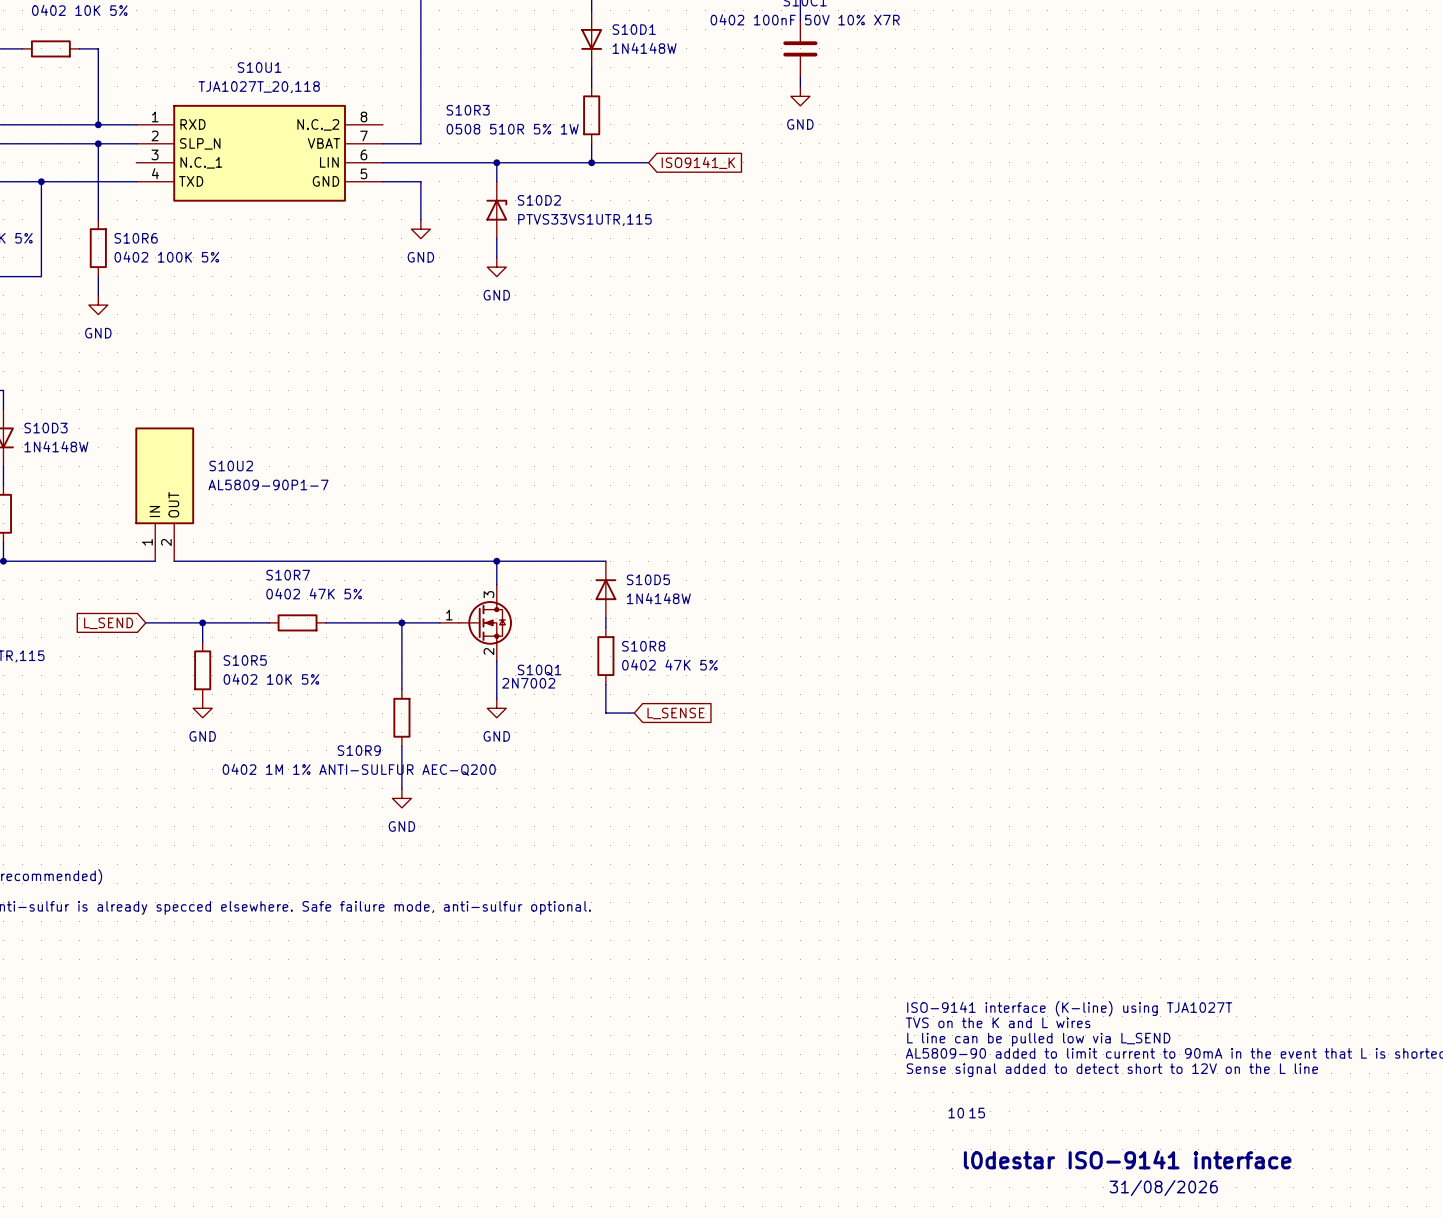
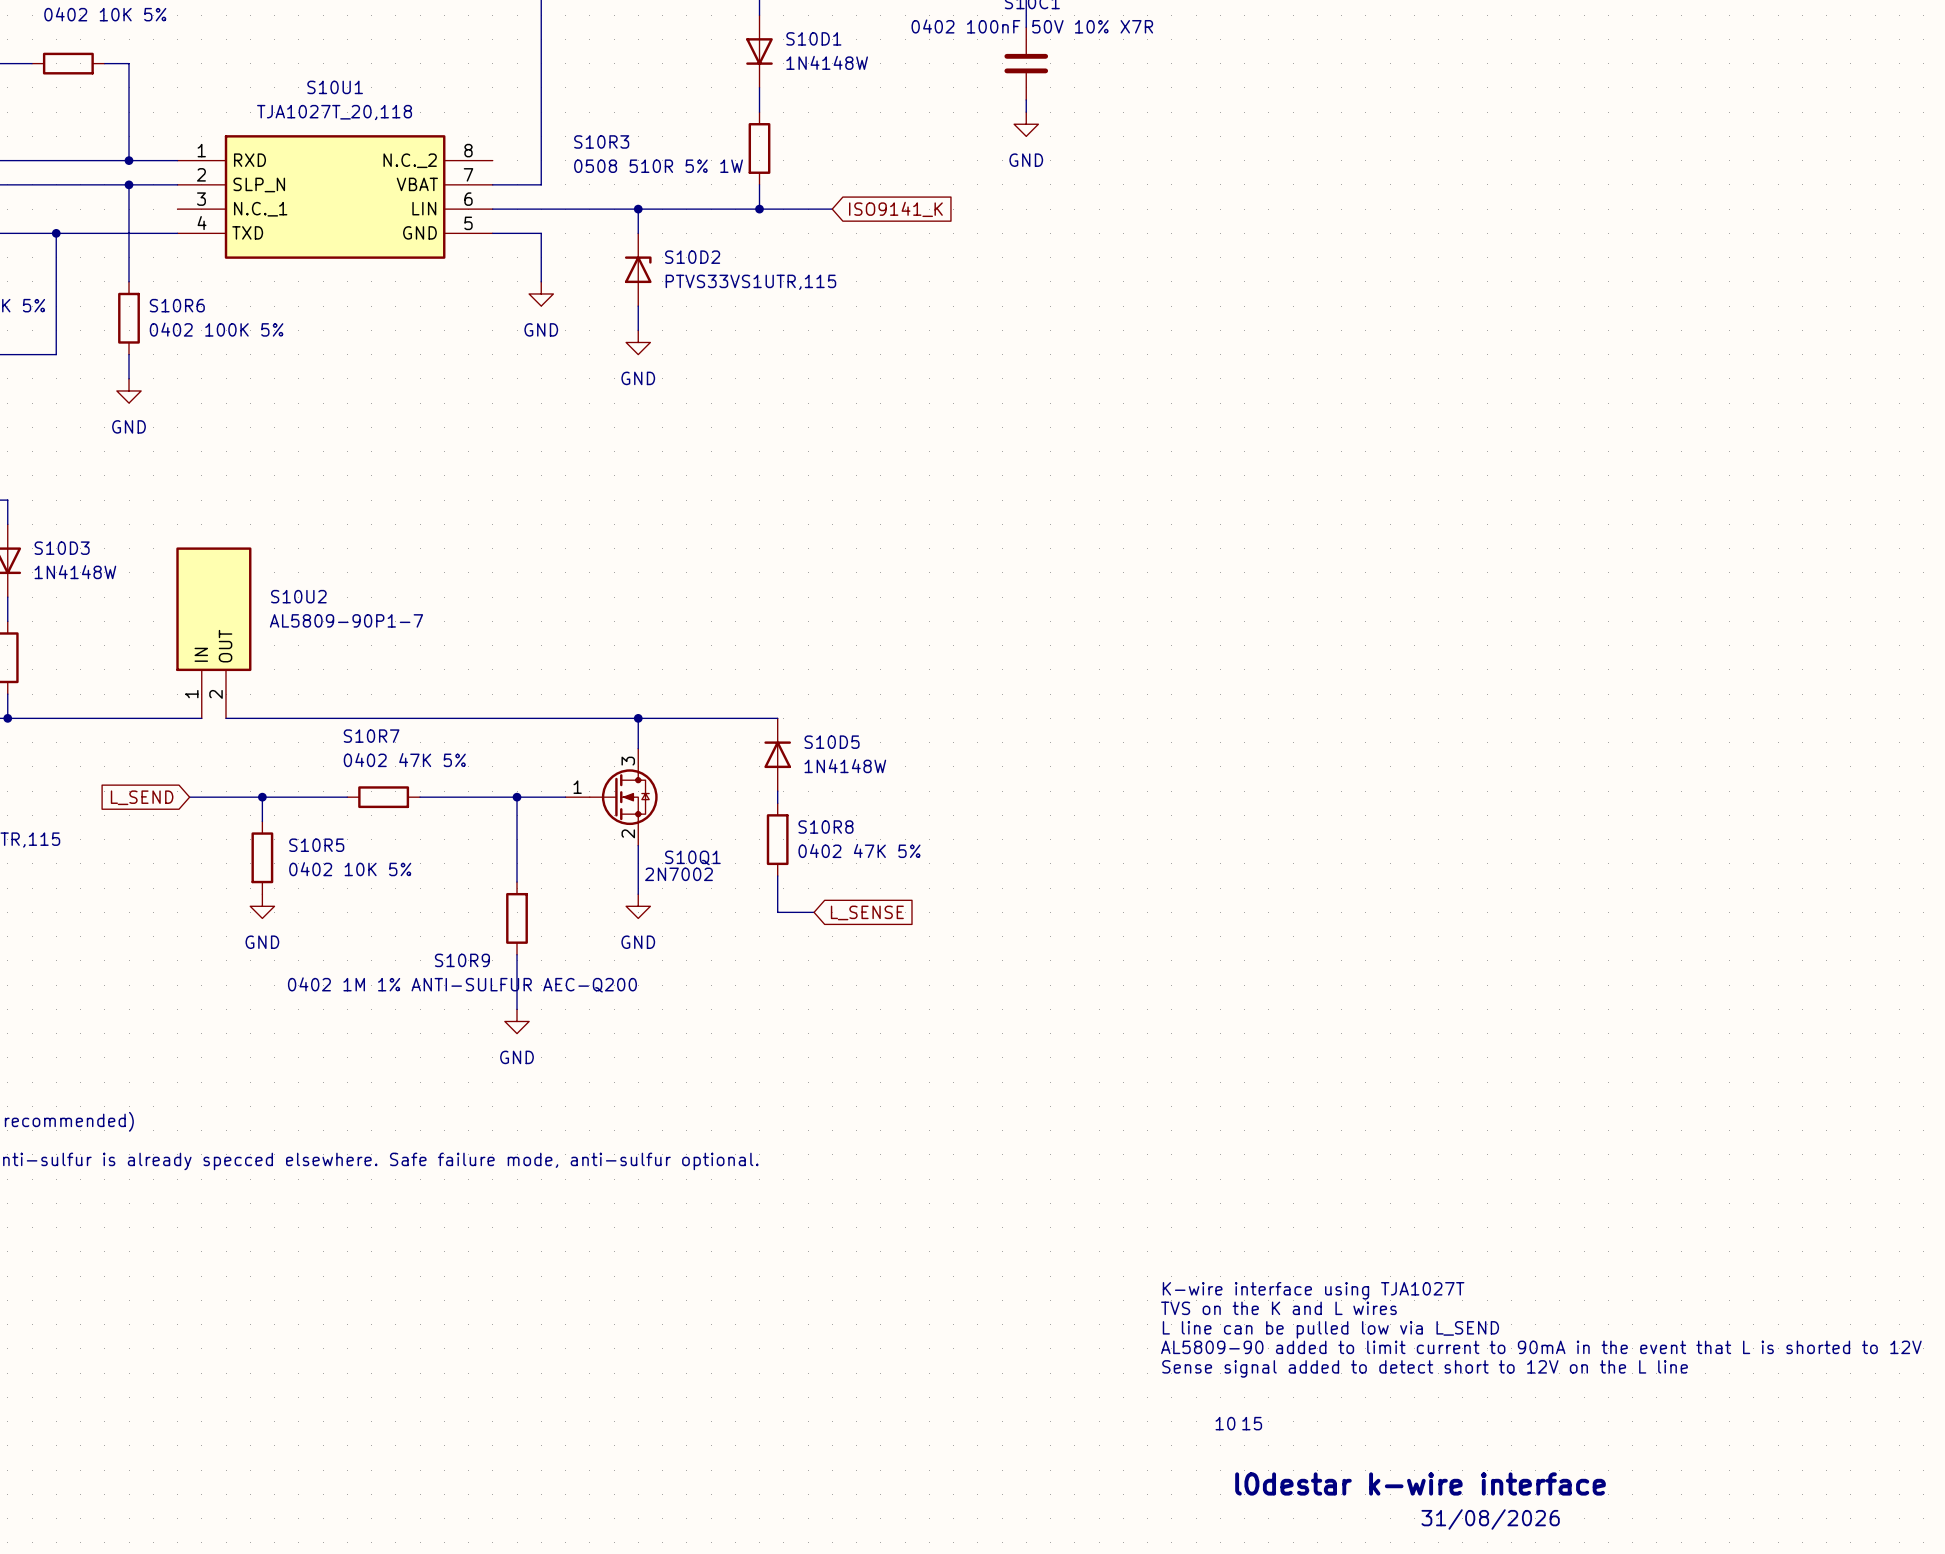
text: ISO-9141 interface (K-line) using TJA1027T (1069, 1008) -> K-wire interface using TJA1027T (1313, 1290)
text: l0destar ISO-9141 interface (1127, 1159) -> l0destar k-wire interface (1420, 1483)

